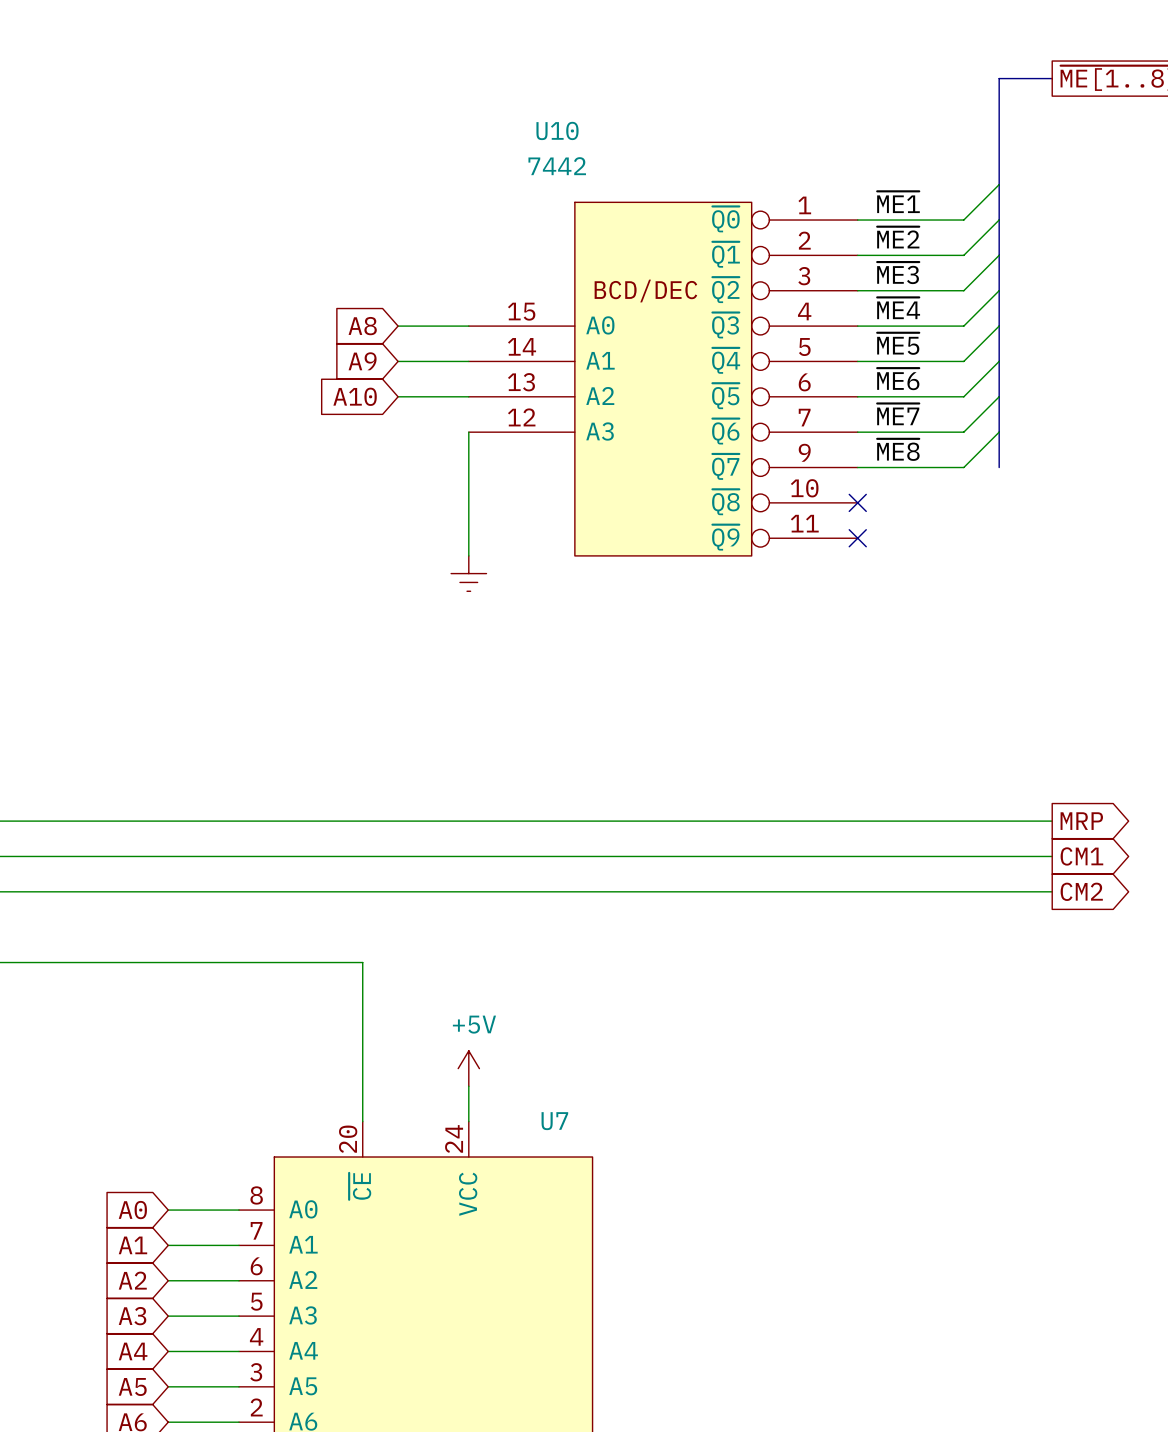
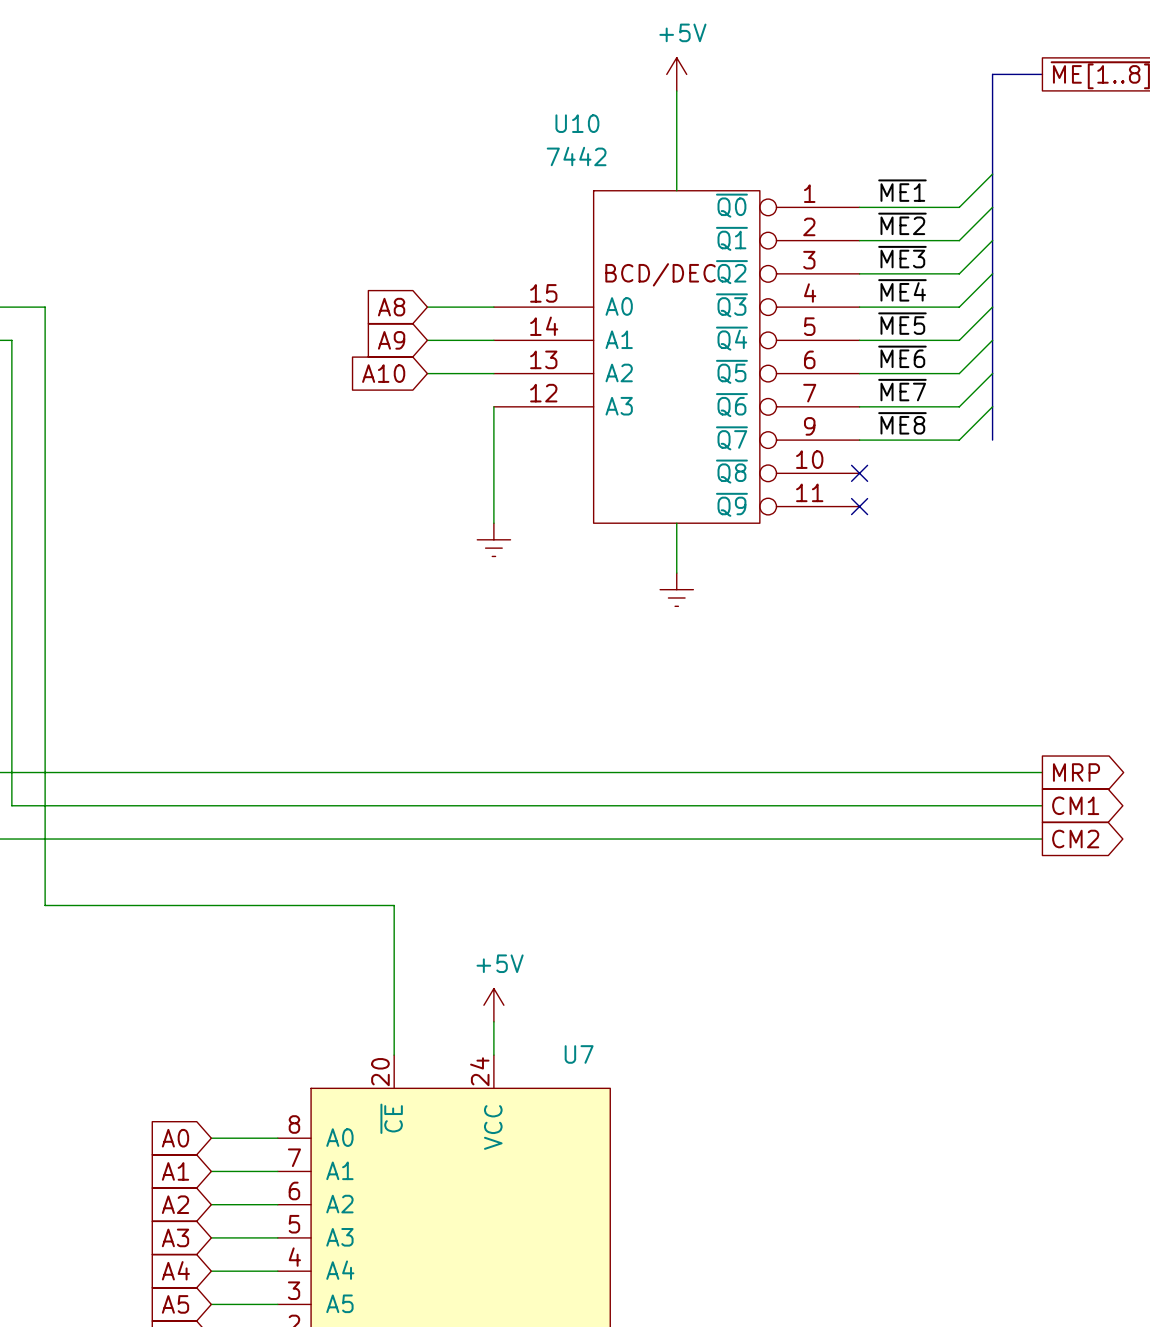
power symbol: none -> +5V (676, 74)
wire: none -> (676, 91) (676, 190)
U10 symbol: [468, 202, 858, 556] -> [493, 190, 860, 524]
wire: none -> (676, 523) (676, 573)
power symbol: none -> (676, 589)

